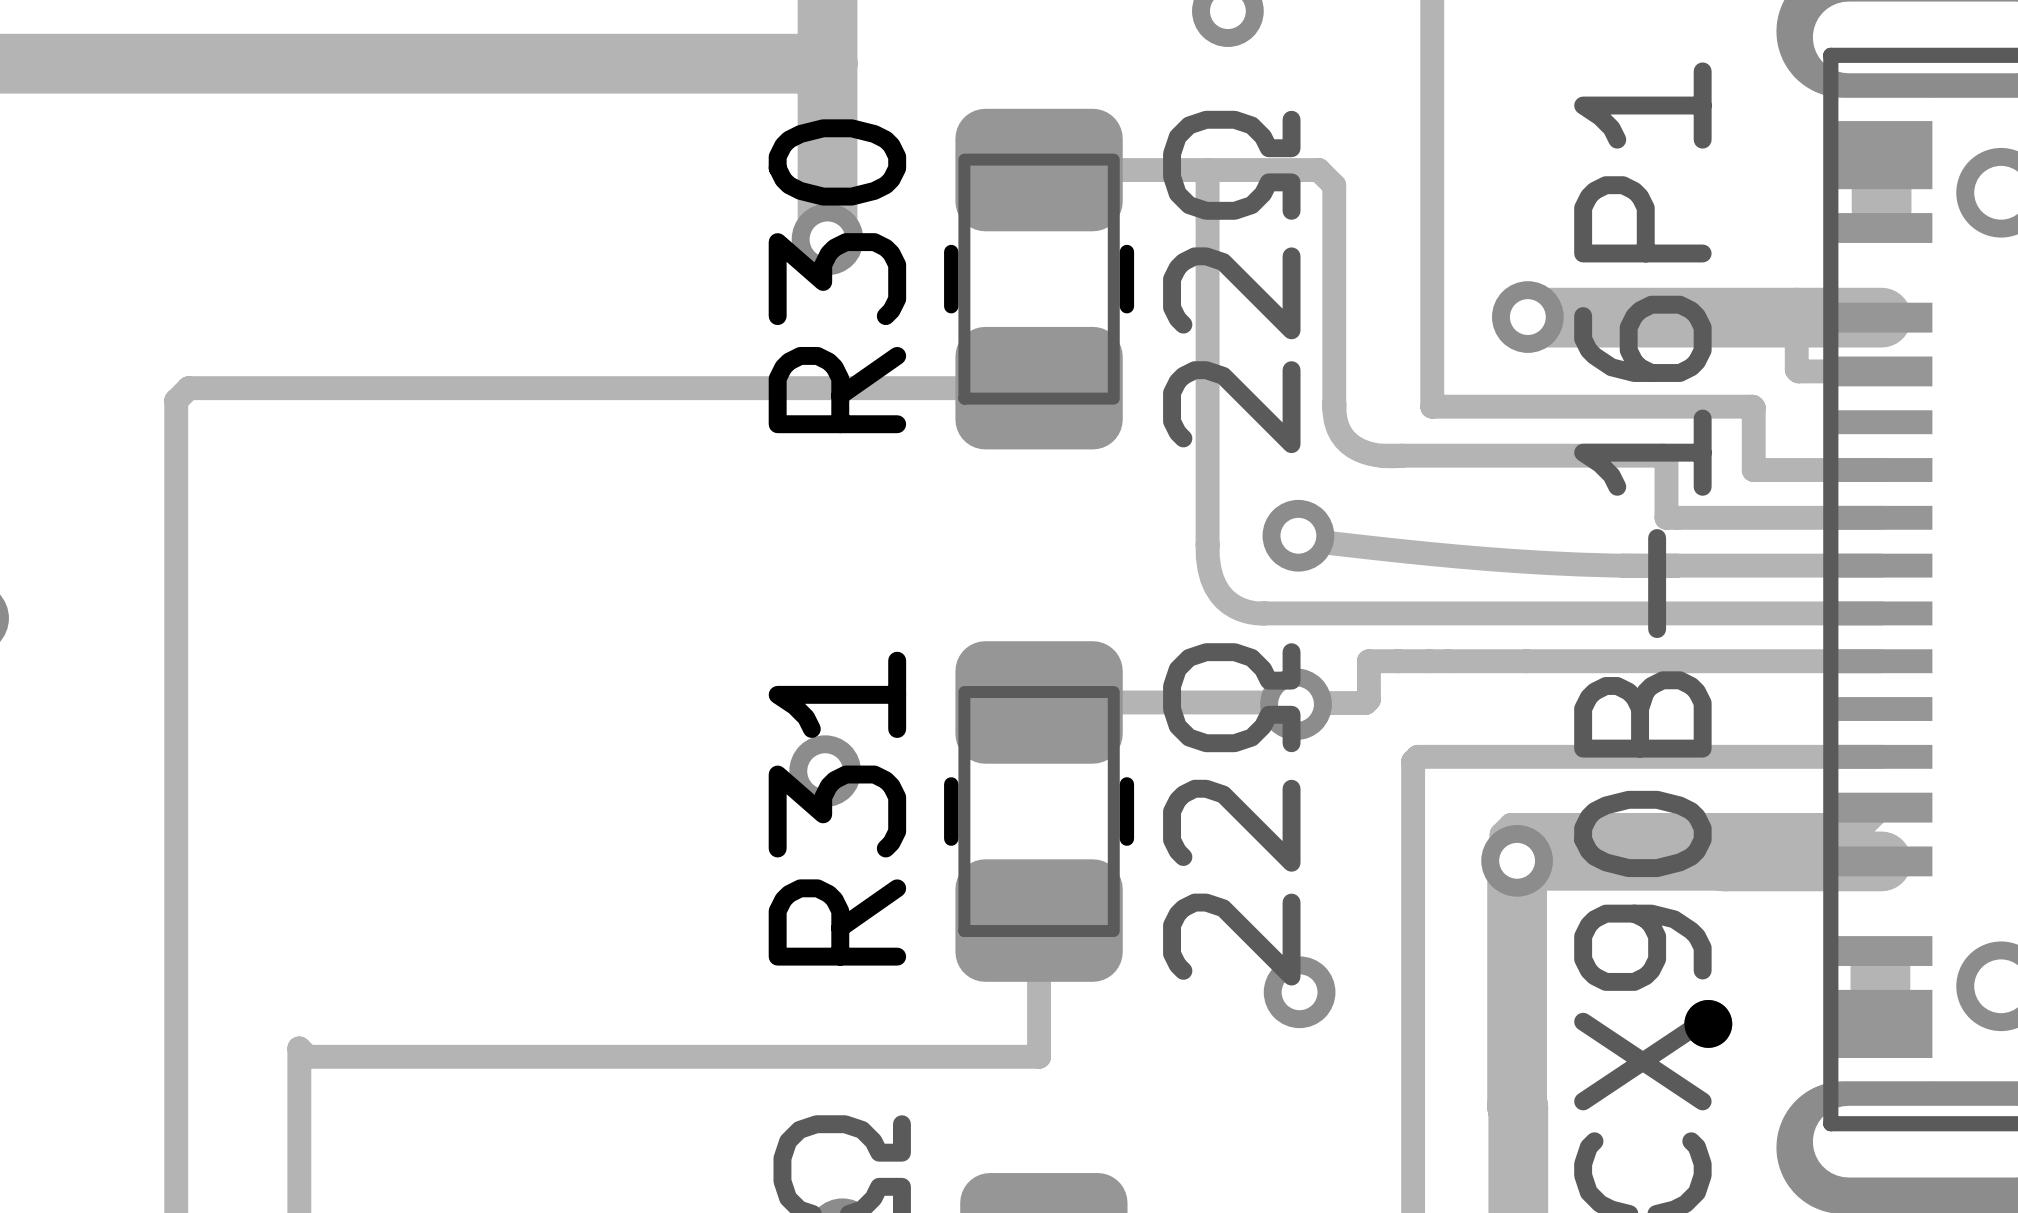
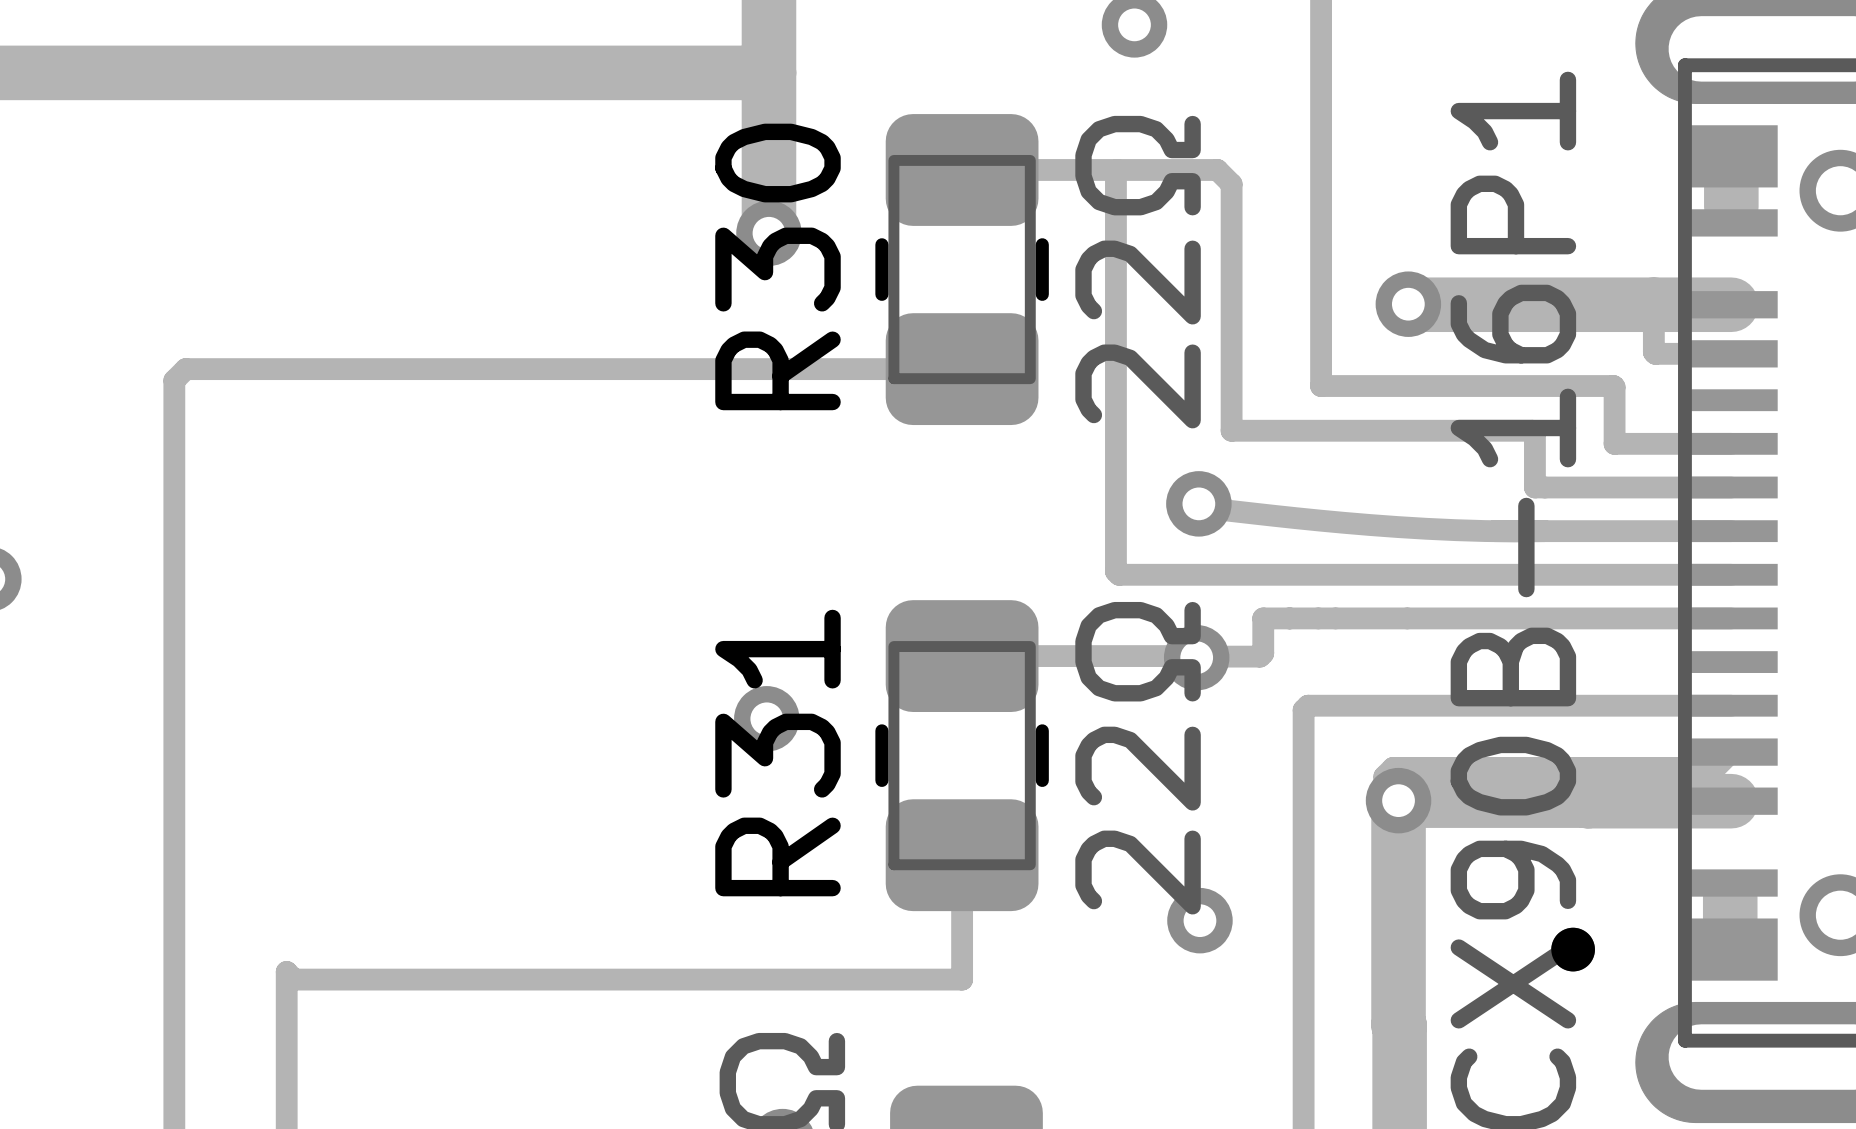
track: (1334, 403) (1337, 427) (1349, 443) (1370, 453) (1402, 455) -> (1231, 387) (1231, 430) (1275, 430)
track: (1207, 544) (1209, 568) (1219, 593) (1229, 603) (1240, 609) (1265, 613) -> (1115, 512) (1115, 571) (1119, 574) (1166, 574)

